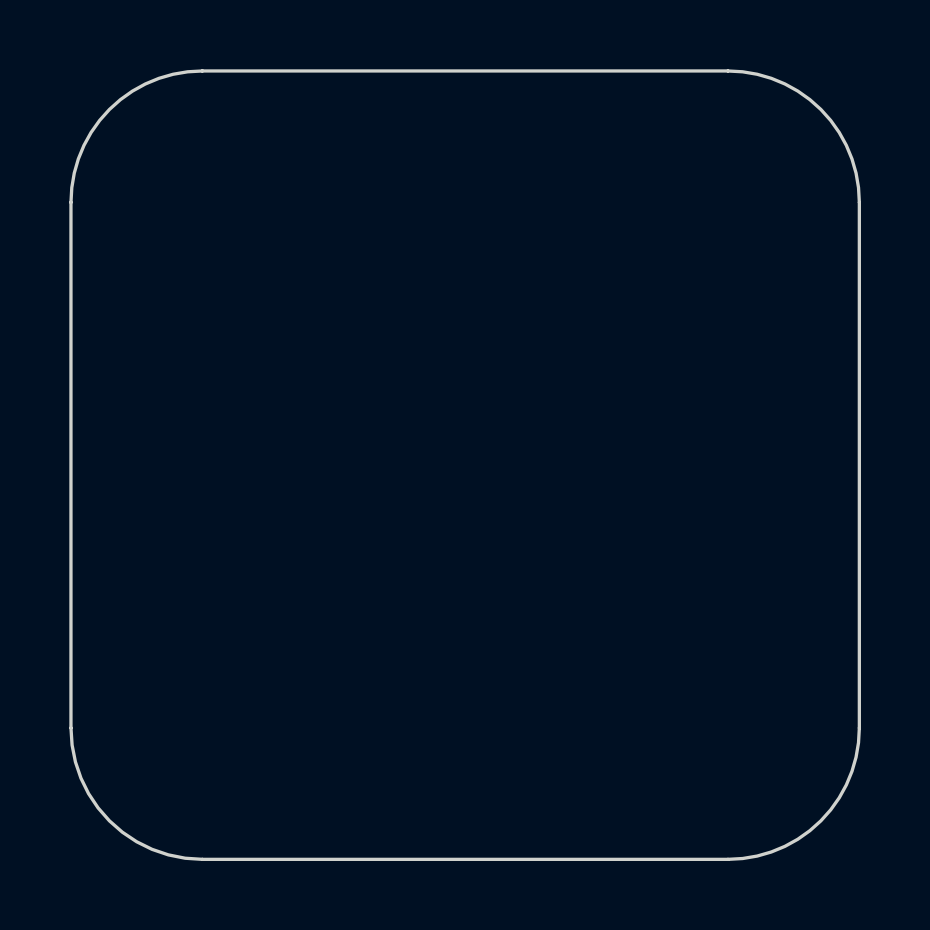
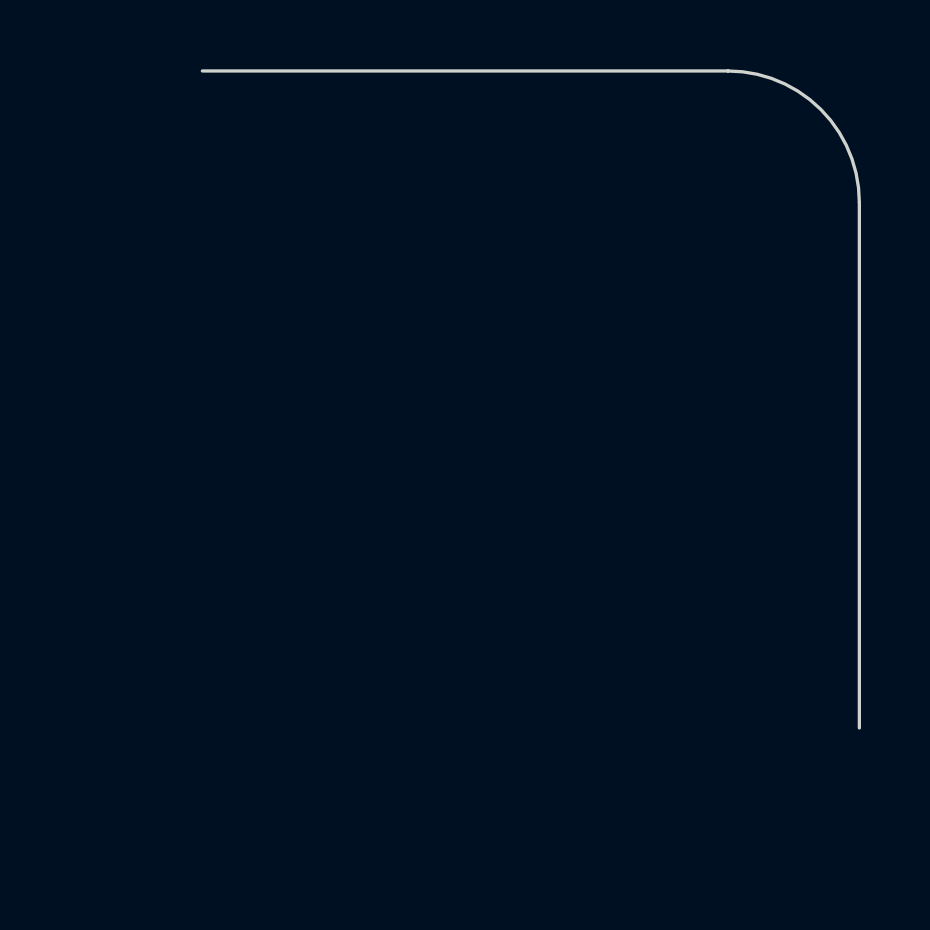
board edge: (202, 70) (173, 74) (158, 78) (145, 83) (120, 99) (99, 120) (83, 145) (78, 158) (71, 187) (70, 727) (72, 745) (80, 778) (98, 807) (109, 820) (136, 841) (152, 849) (185, 858) (202, 859) (742, 858) (771, 851) (784, 846) (809, 830) (820, 820) (839, 797) (846, 784) (856, 757) (859, 727) -> none

